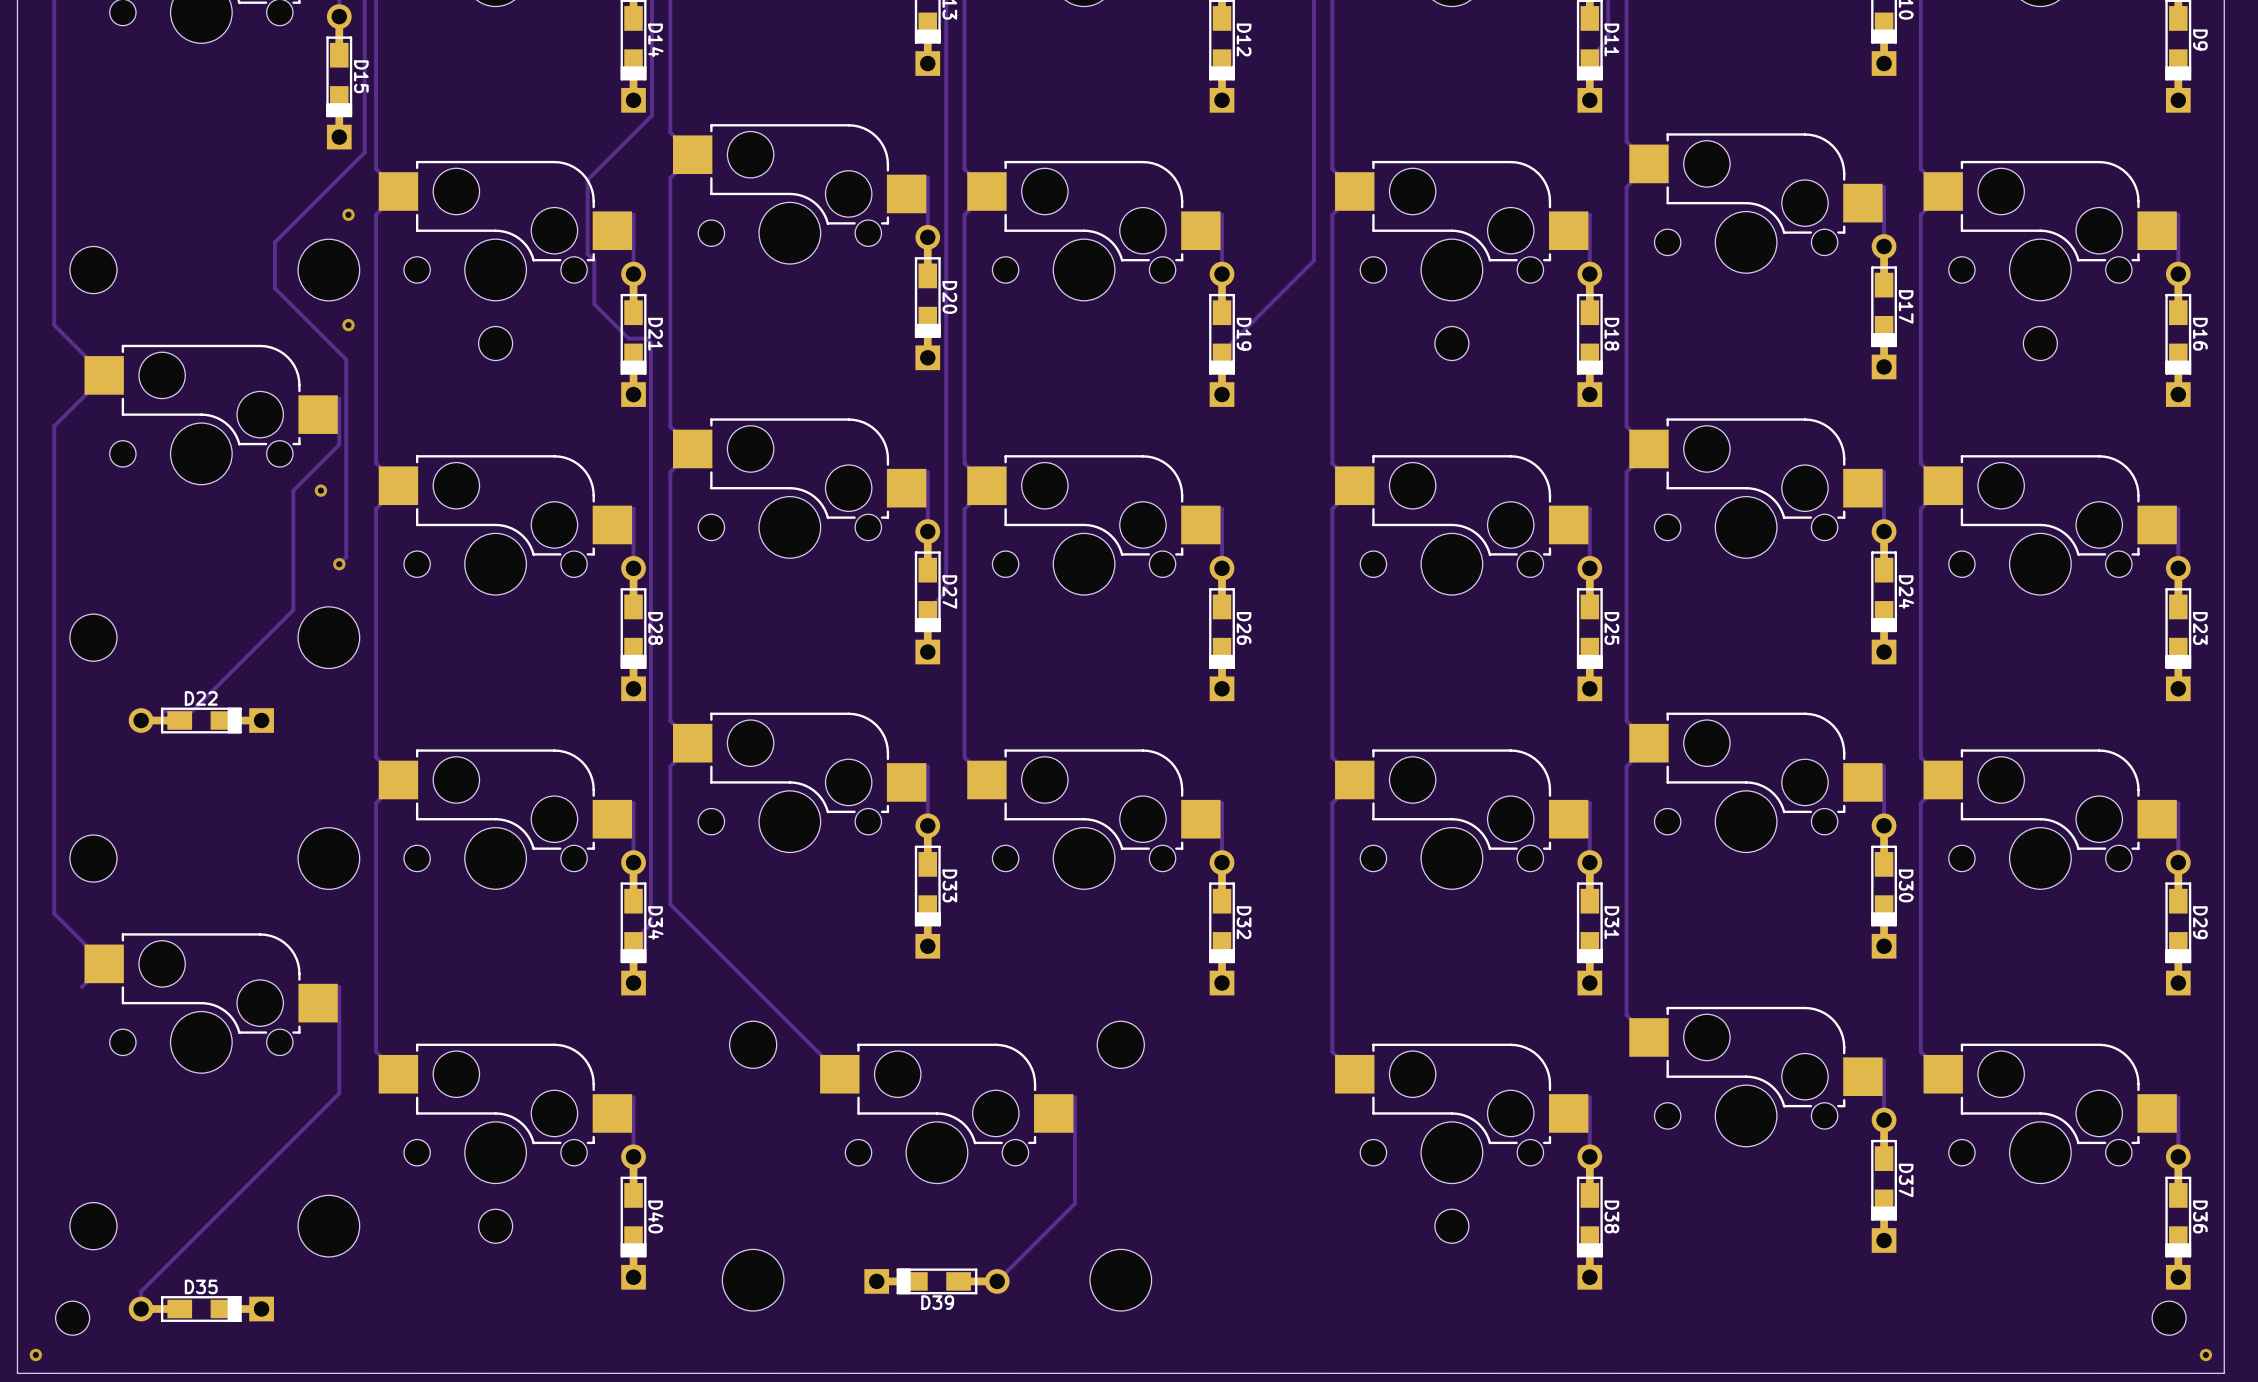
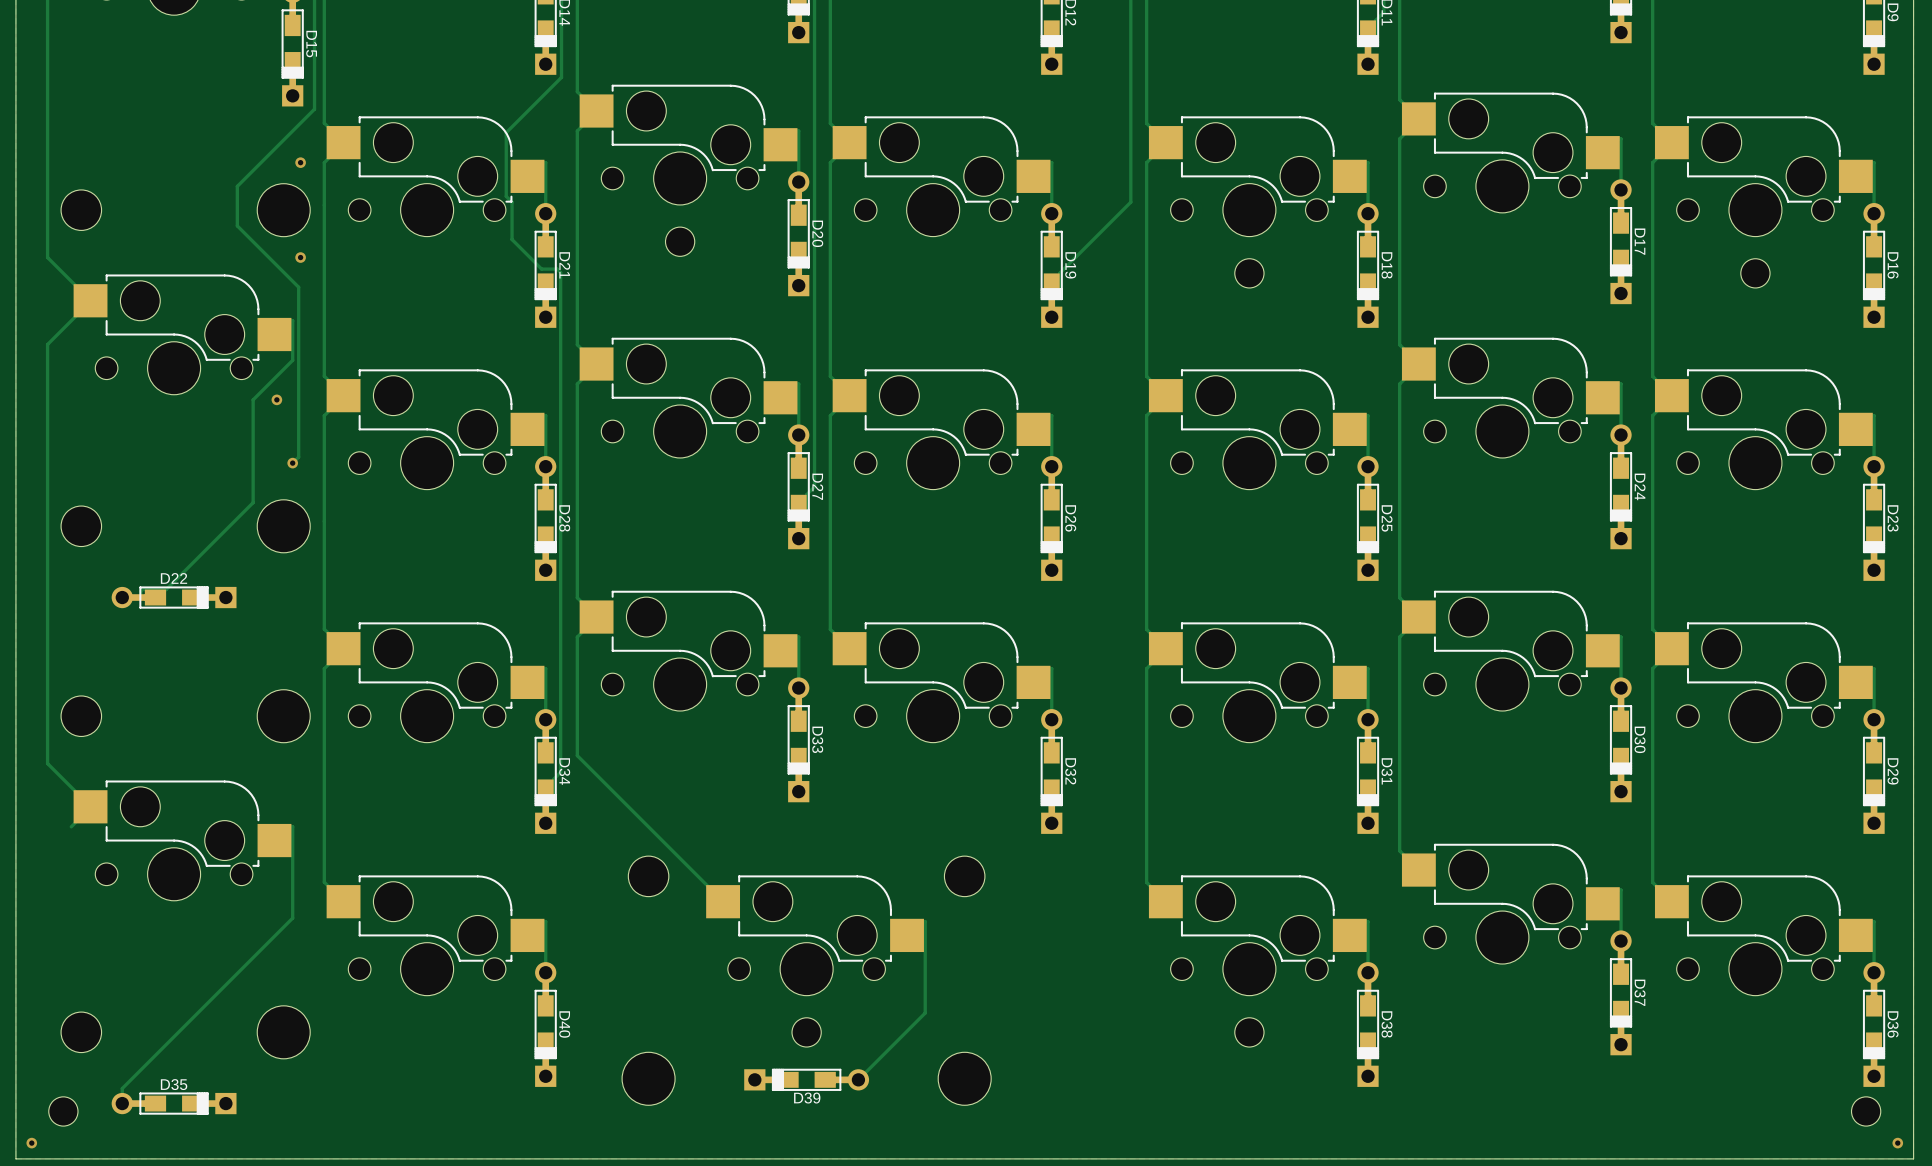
part position: (495, 343) -> (680, 241)
part: (495, 1226) -> none
part: none -> (806, 1032)

